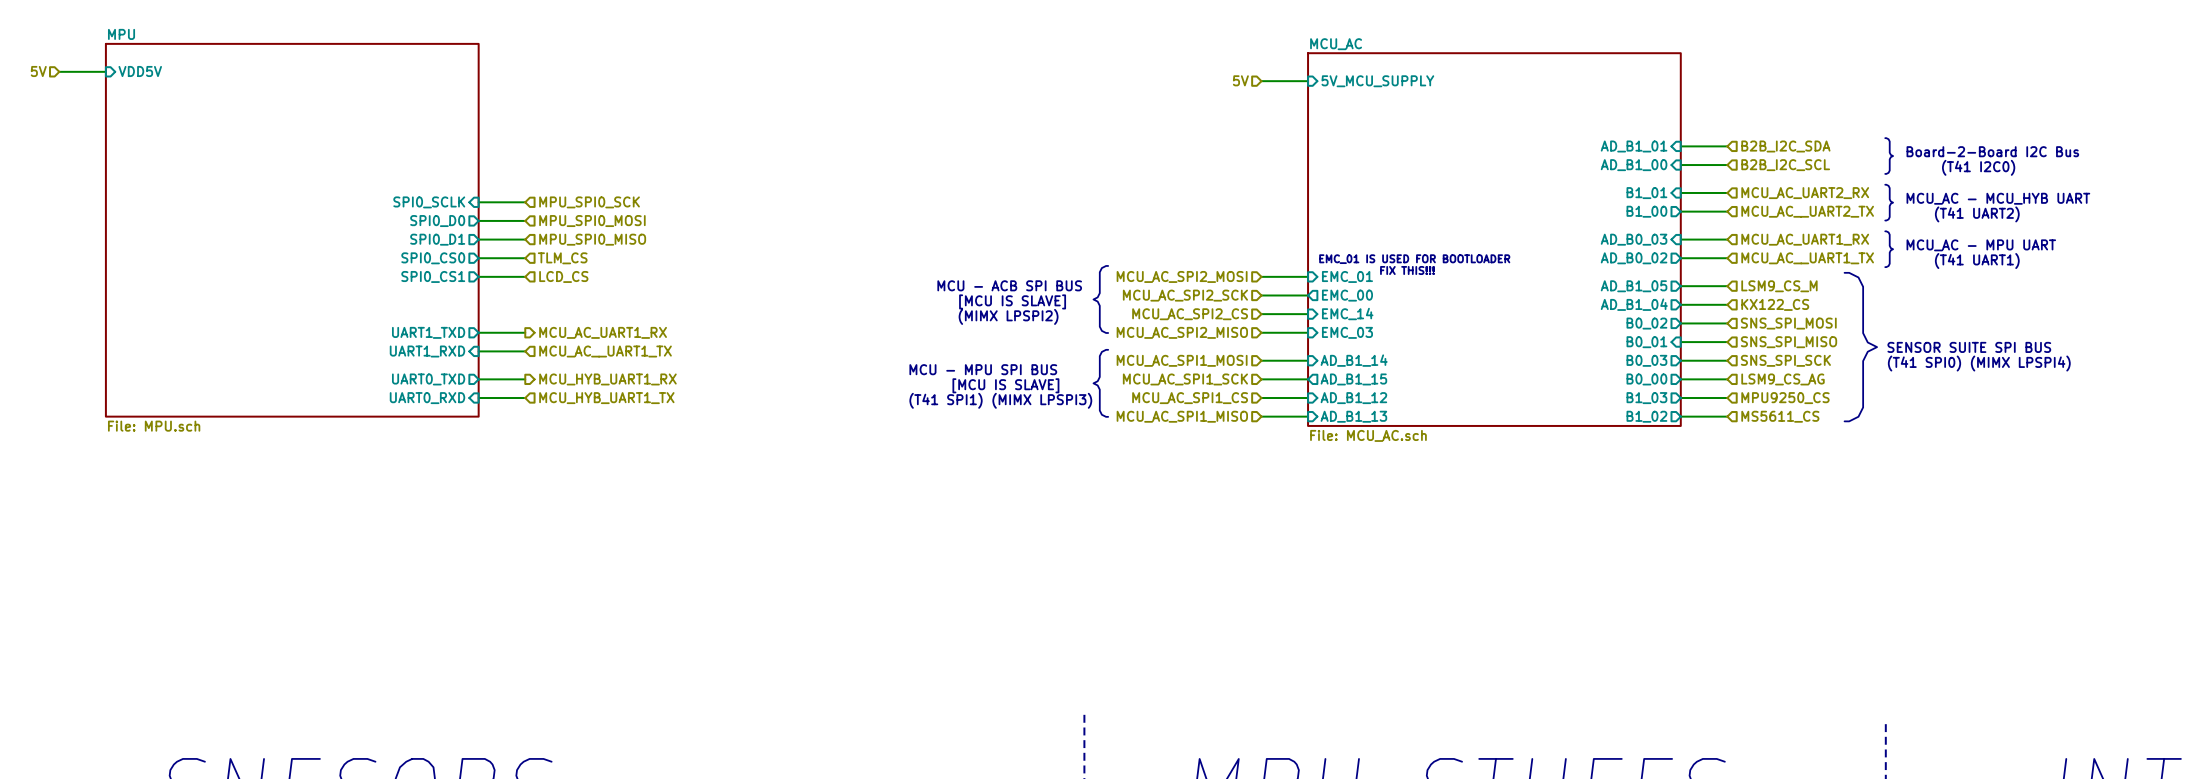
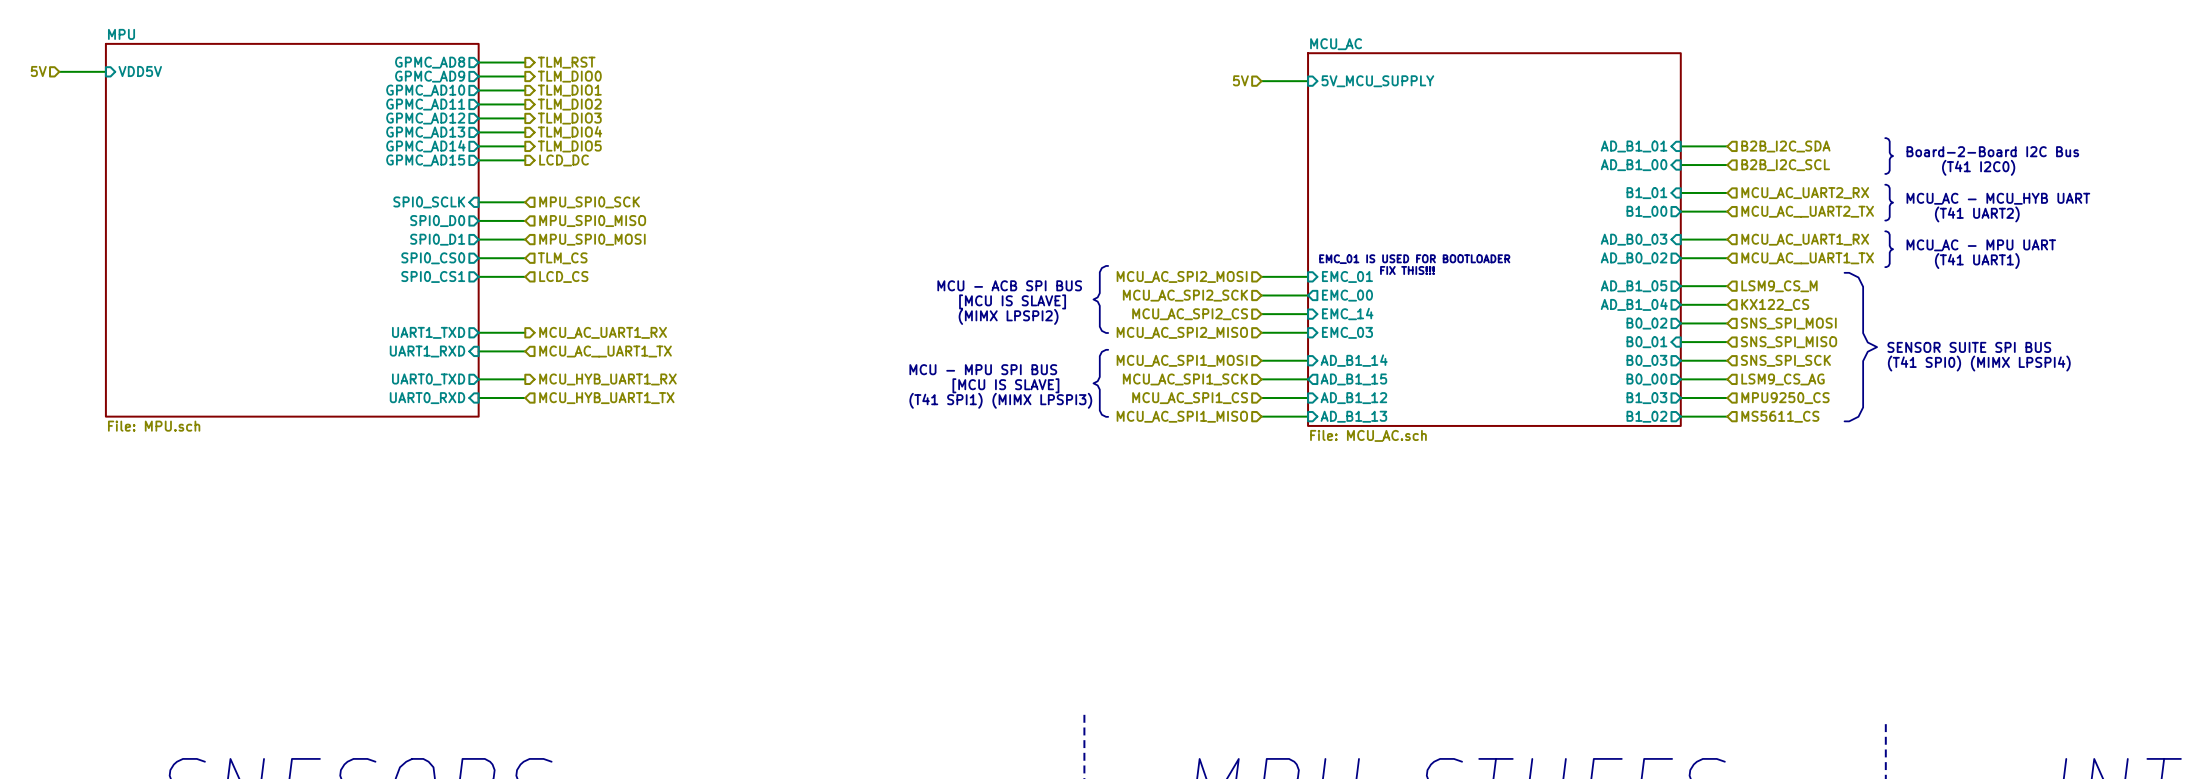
sheet pin: none -> GPMC_AD8 (430, 62)
wire: none -> (478, 62) (525, 62)
hierarchical label: none -> TLM_RST (566, 62)
sheet pin: none -> GPMC_AD9 (430, 76)
wire: none -> (478, 76) (525, 76)
hierarchical label: none -> TLM_DIO0 (569, 76)
sheet pin: none -> GPMC_AD10 (425, 90)
wire: none -> (478, 90) (525, 90)
hierarchical label: none -> TLM_DIO1 (569, 90)
sheet pin: none -> GPMC_AD11 (425, 104)
wire: none -> (478, 104) (525, 104)
hierarchical label: none -> TLM_DIO2 (569, 104)
sheet pin: none -> GPMC_AD12 (425, 118)
wire: none -> (478, 118) (525, 118)
hierarchical label: none -> TLM_DIO3 (569, 118)
sheet pin: none -> GPMC_AD13 (425, 132)
wire: none -> (478, 132) (525, 132)
hierarchical label: none -> TLM_DIO4 (570, 132)
sheet pin: none -> GPMC_AD14 (425, 146)
wire: none -> (478, 146) (525, 146)
hierarchical label: none -> TLM_DIO5 (569, 146)
sheet pin: none -> GPMC_AD15 (425, 160)
wire: none -> (478, 160) (525, 160)
hierarchical label: none -> LCD_DC (564, 160)
hierarchical label: MPU_SPI0_MOSI (592, 221) -> MPU_SPI0_MISO (592, 221)
hierarchical label: MPU_SPI0_MISO (592, 239) -> MPU_SPI0_MOSI (592, 239)

